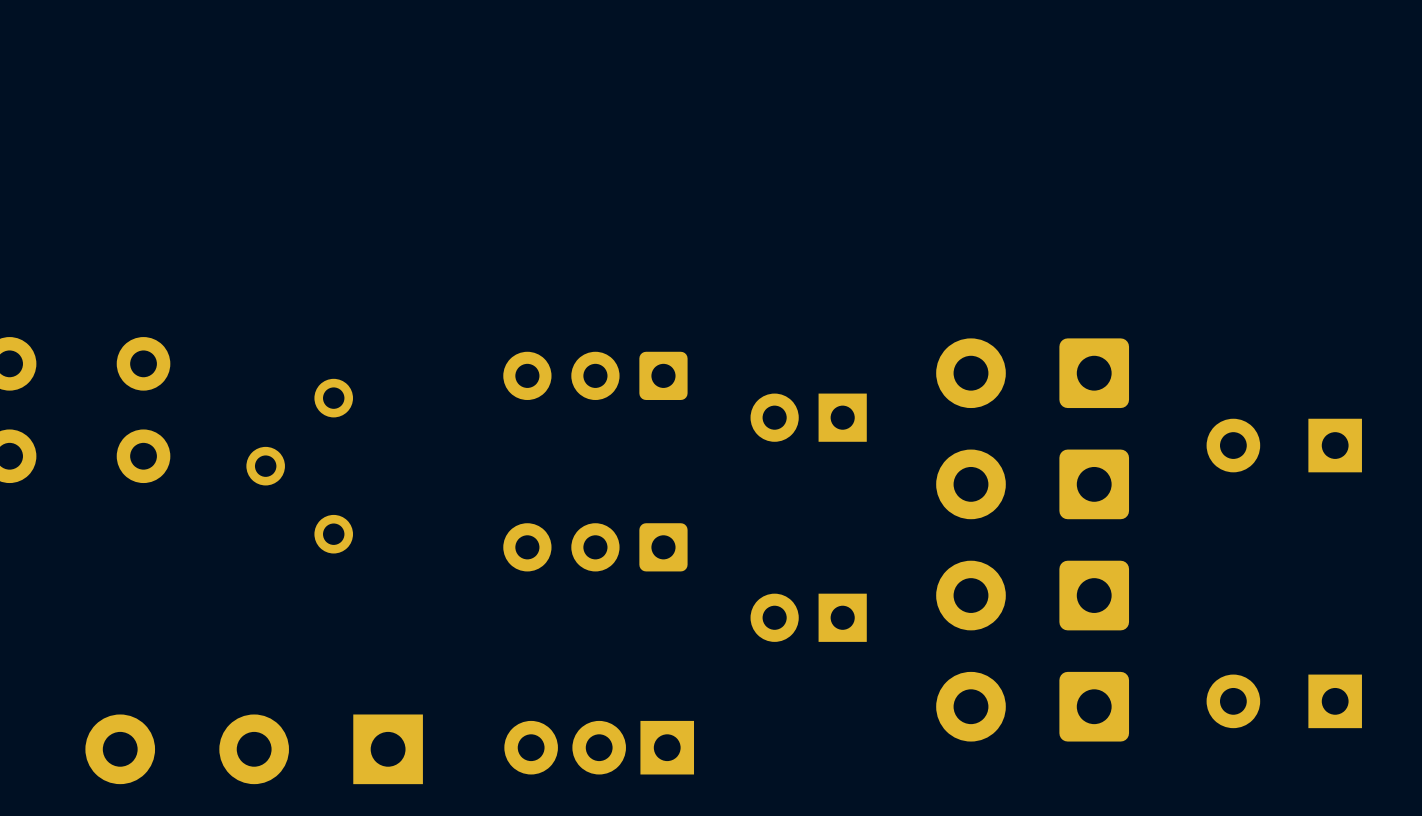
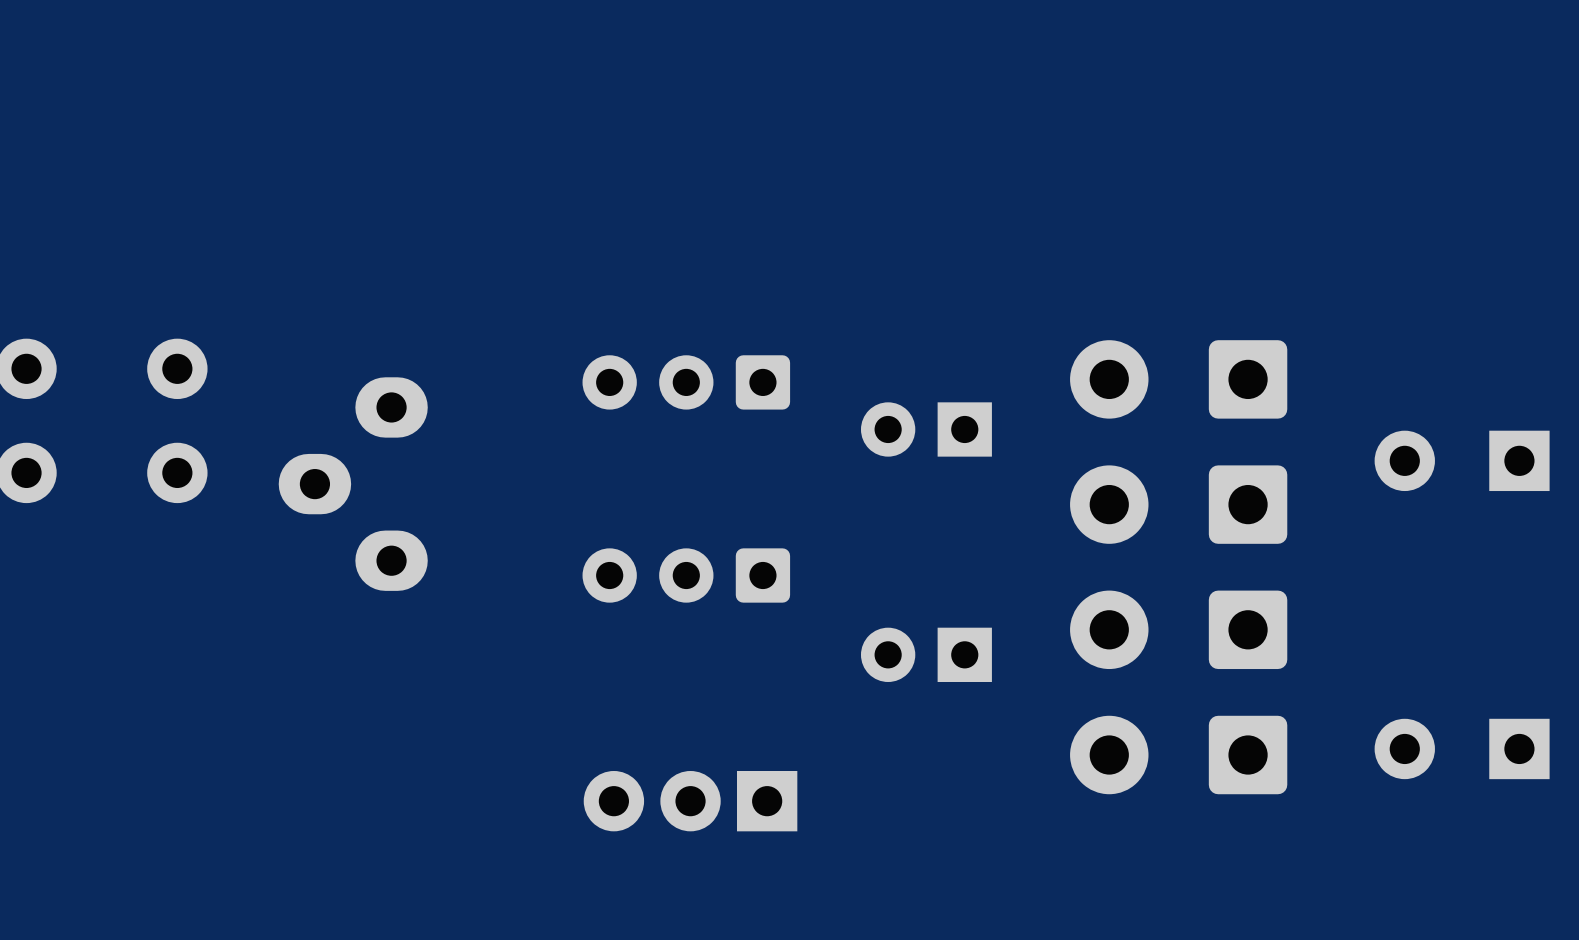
part footprint: [246, 378, 354, 554] -> [278, 377, 428, 591]
part: (254, 749) -> none

